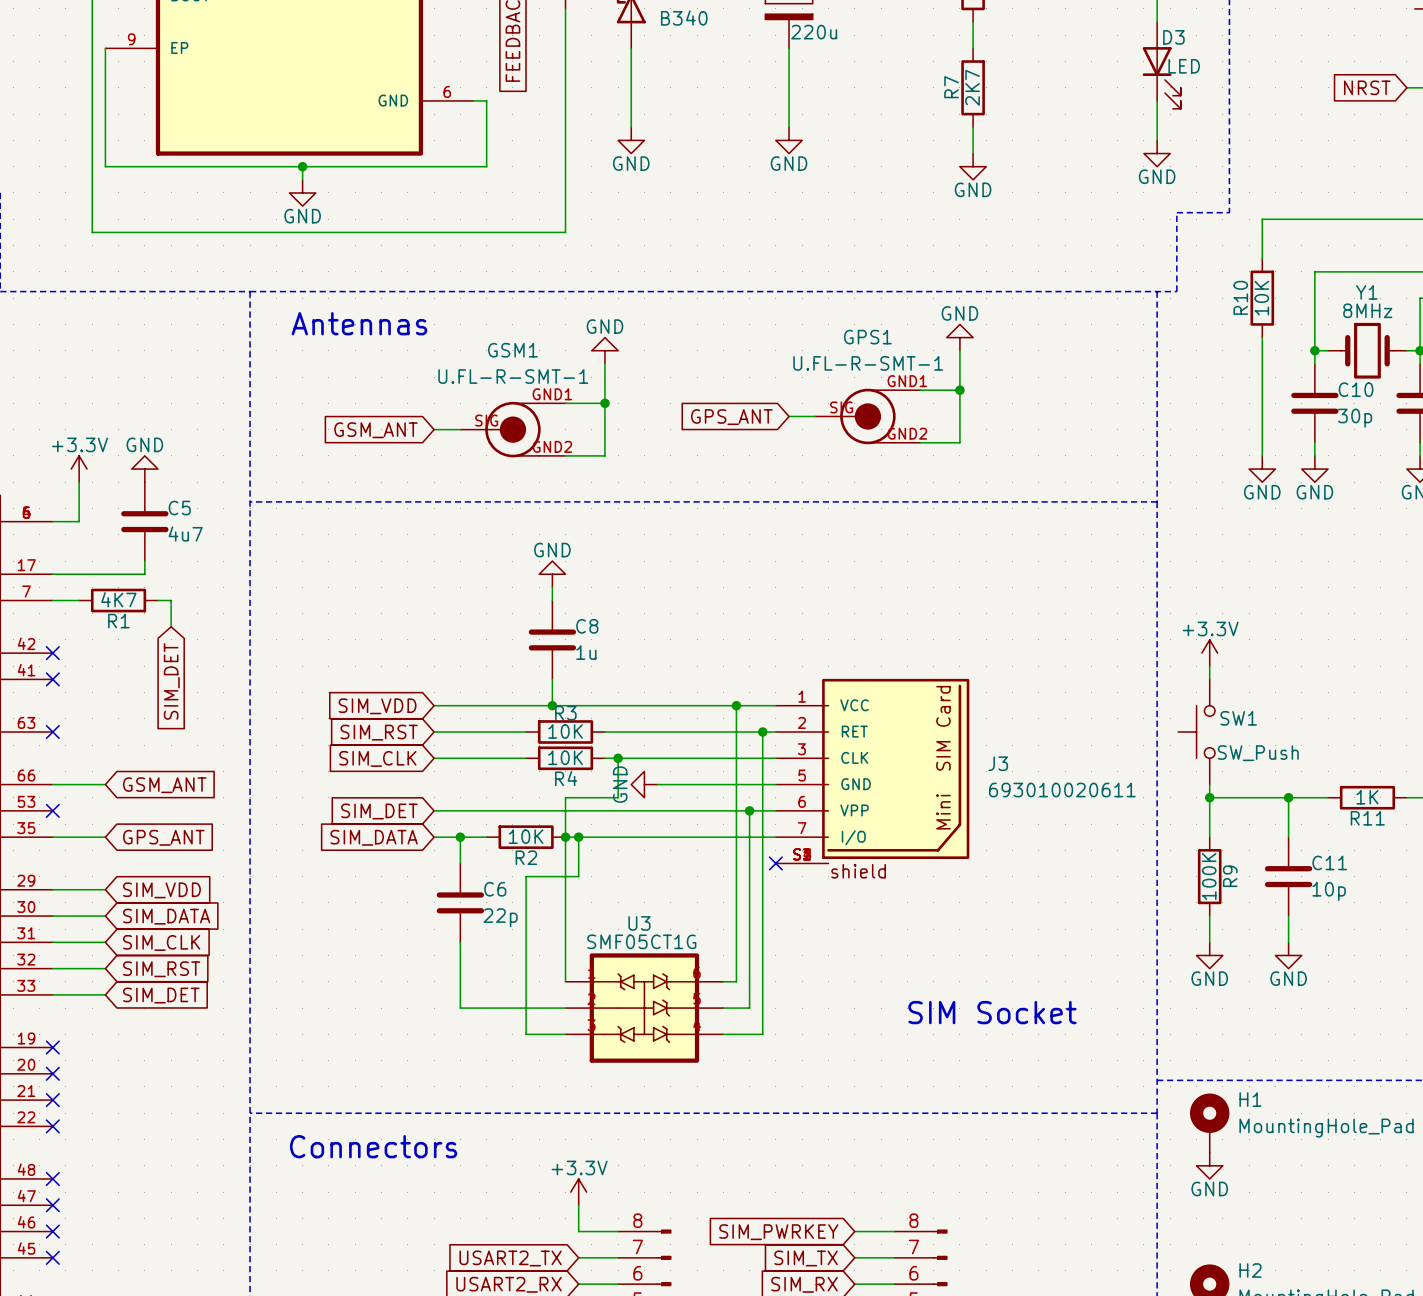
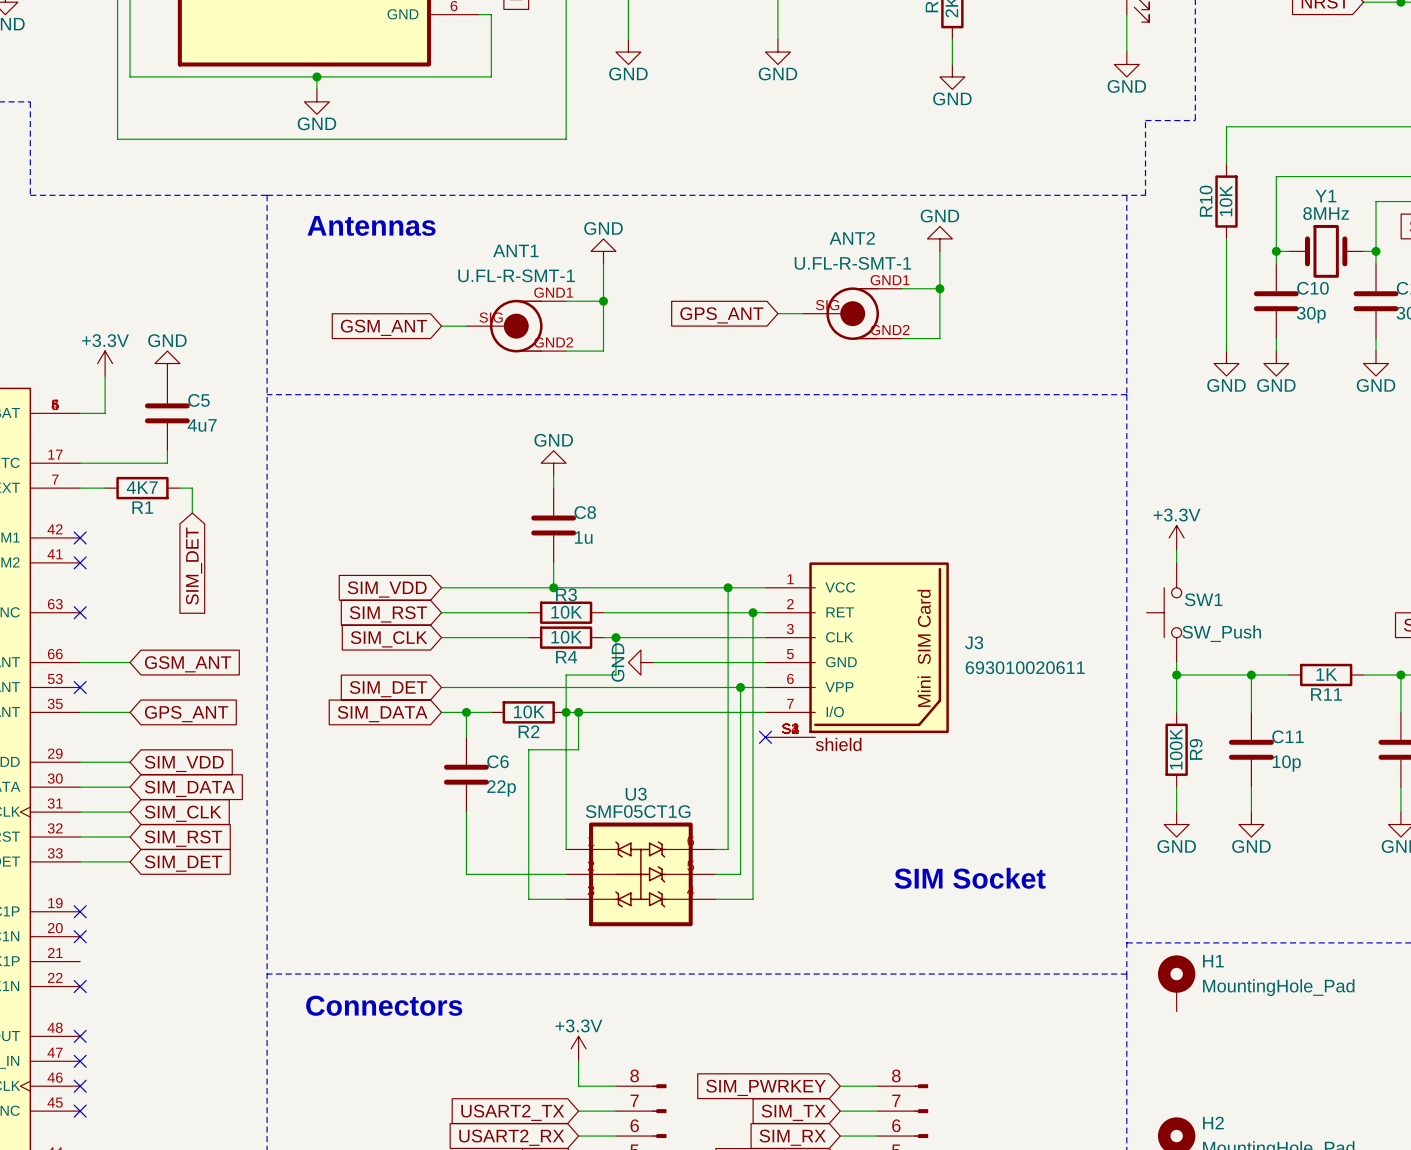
GPS1 name: GPS1 (867, 337) -> ANT2 (852, 238)
GSM1 name: GSM1 (512, 350) -> ANT1 (515, 250)
no-connect mark: (52, 1100) -> none
power symbol: GND (1209, 1165) -> none

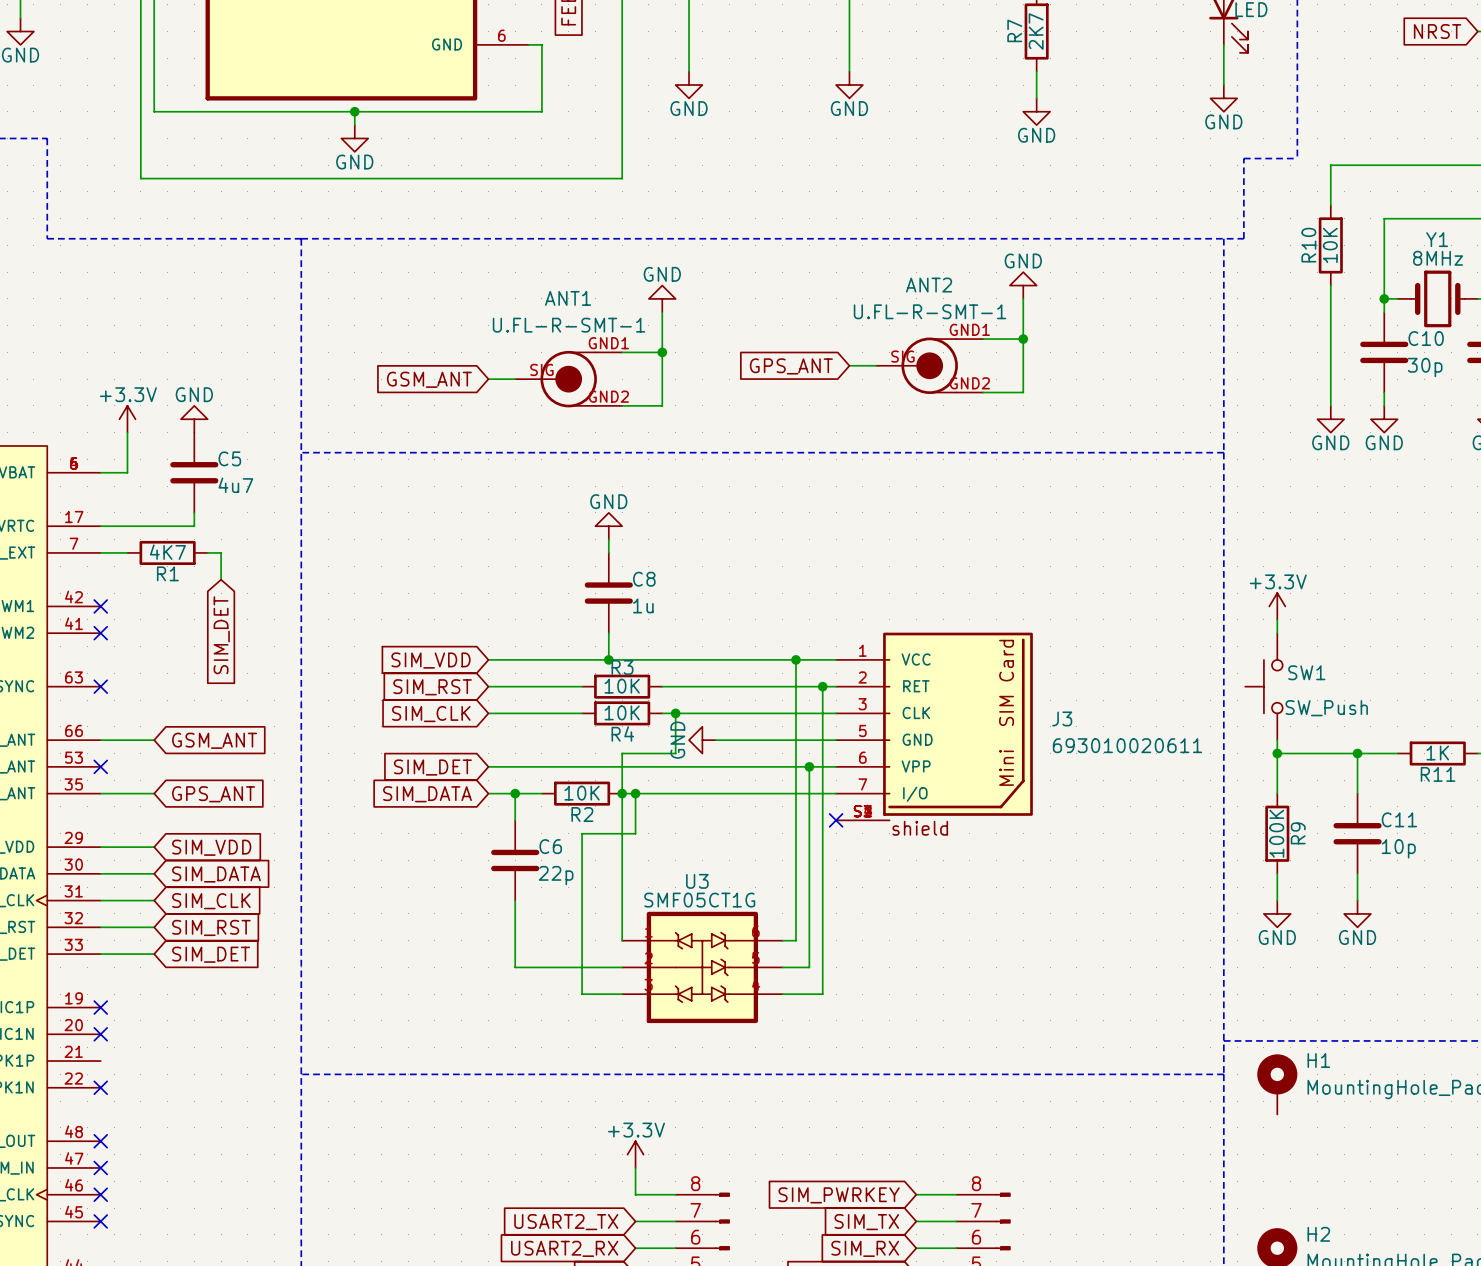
text: Antennas (371, 225) -> none
text: SIM Socket (970, 878) -> none
text: Connectors (384, 1005) -> none

